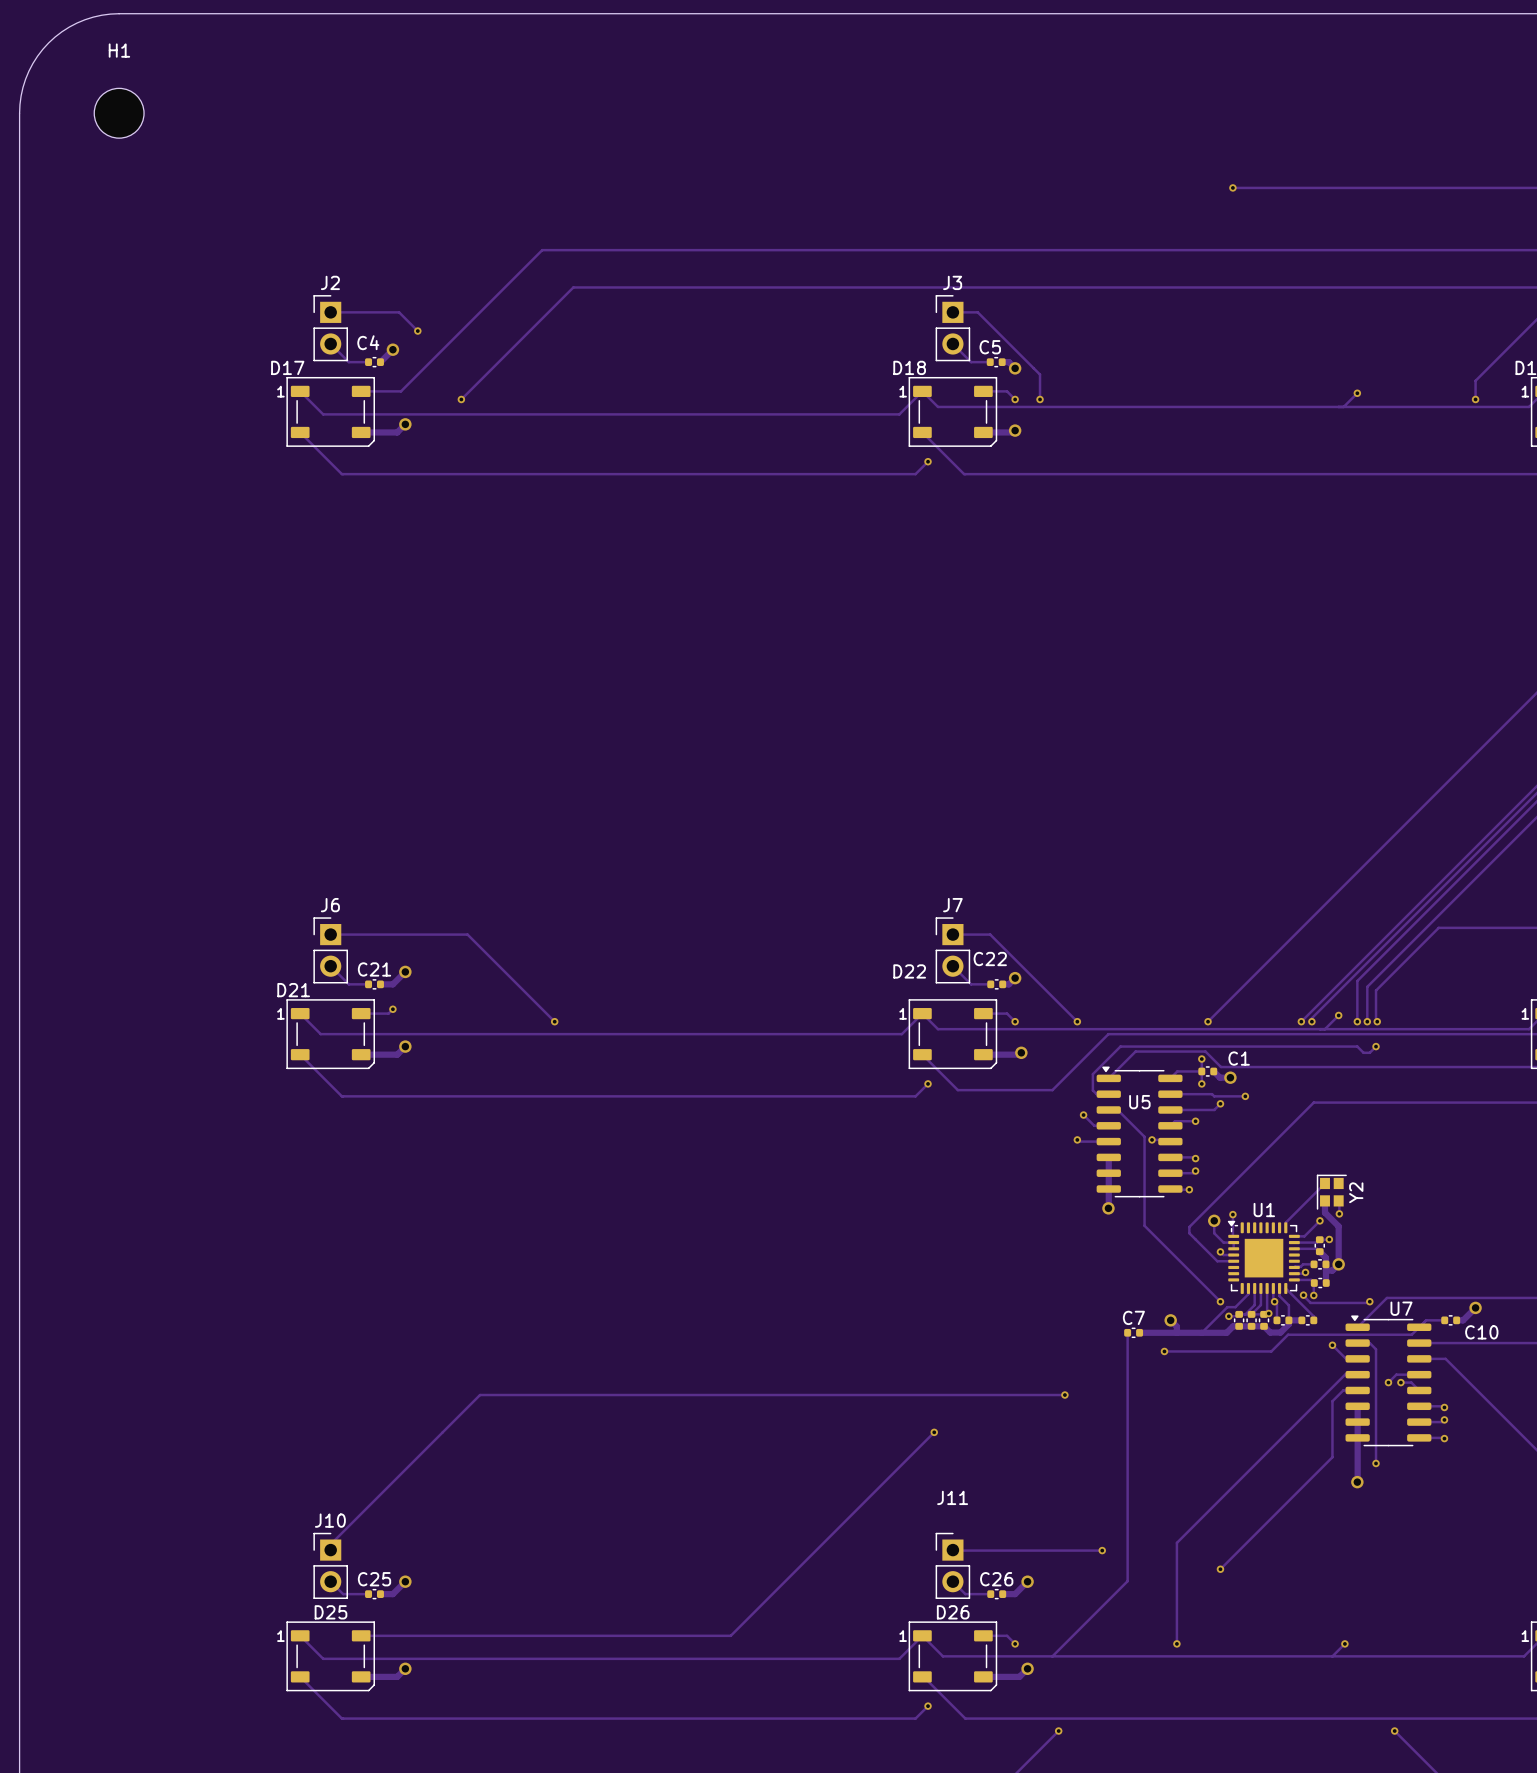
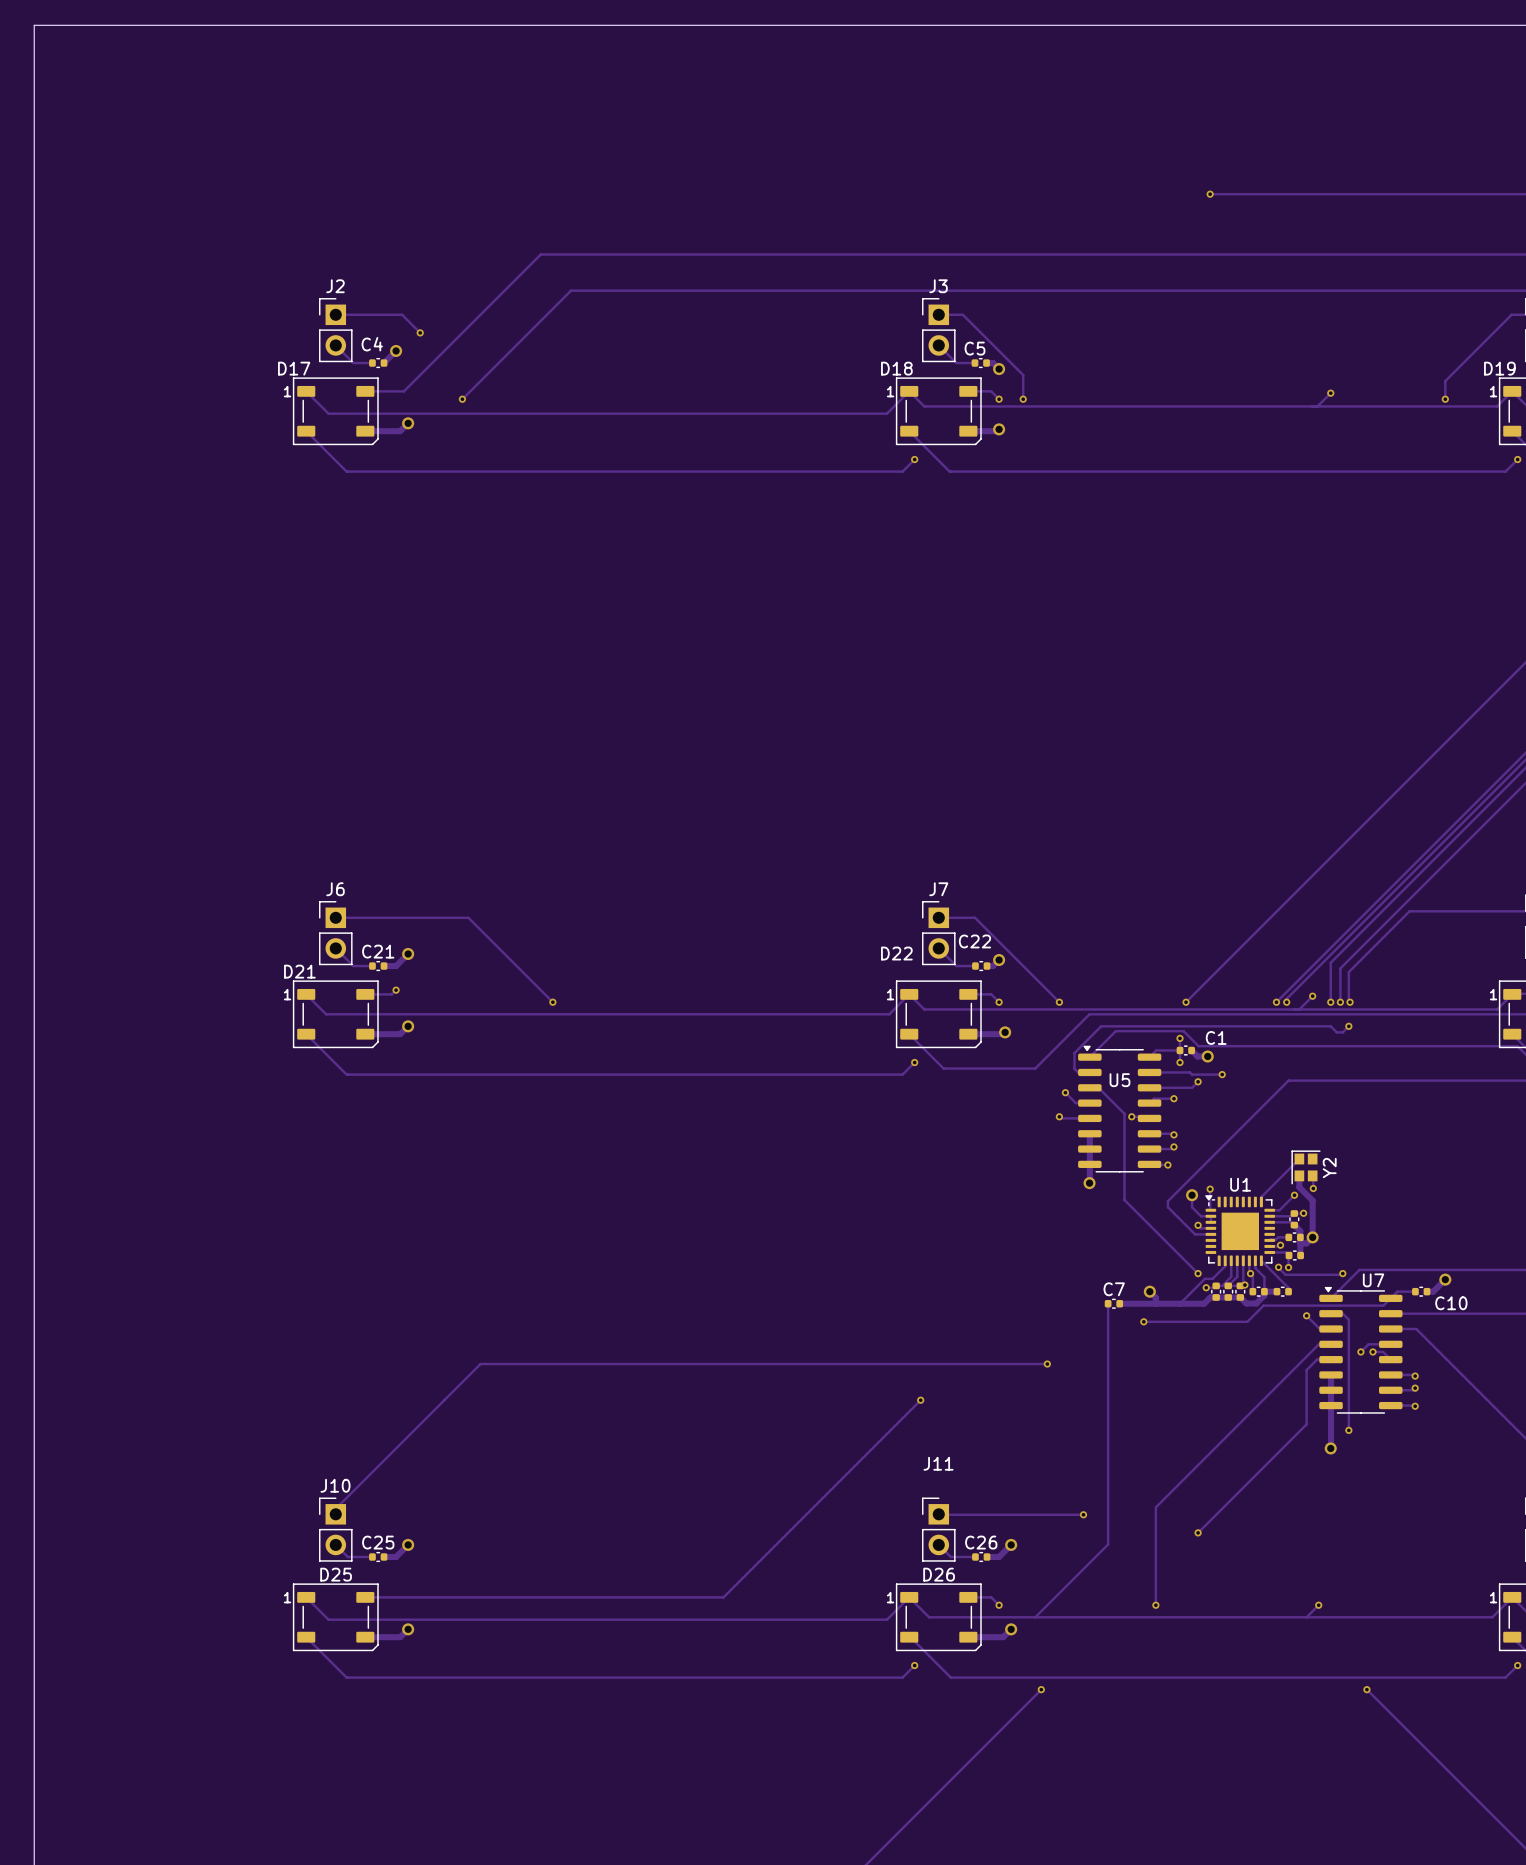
board edge: (119, 13) (101, 15) (85, 19) (69, 27) (48, 42) (32, 63) (25, 79) (21, 95) (19, 113) -> (130, 25) (34, 25) (34, 121)
H1: (119, 113) -> none

